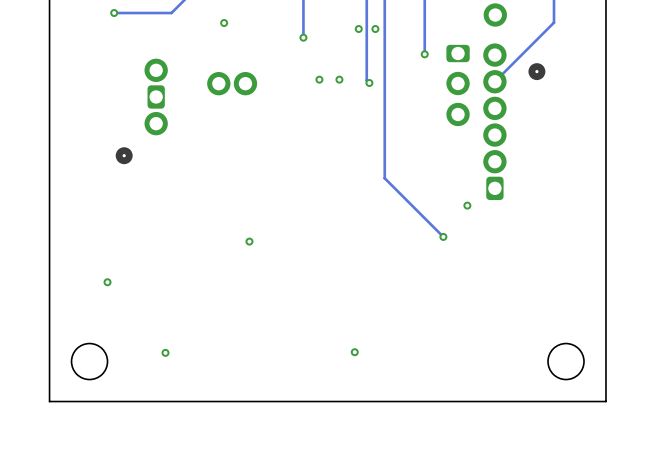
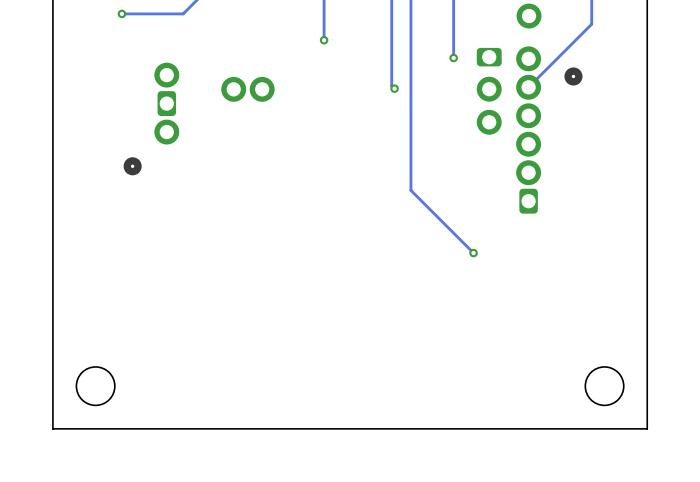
via: (224, 23) -> none
via: (358, 29) -> none
via: (375, 29) -> none
via: (319, 79) -> none
via: (339, 79) -> none
via: (467, 205) -> none
via: (249, 241) -> none
via: (107, 282) -> none
via: (165, 352) -> none
via: (354, 352) -> none

